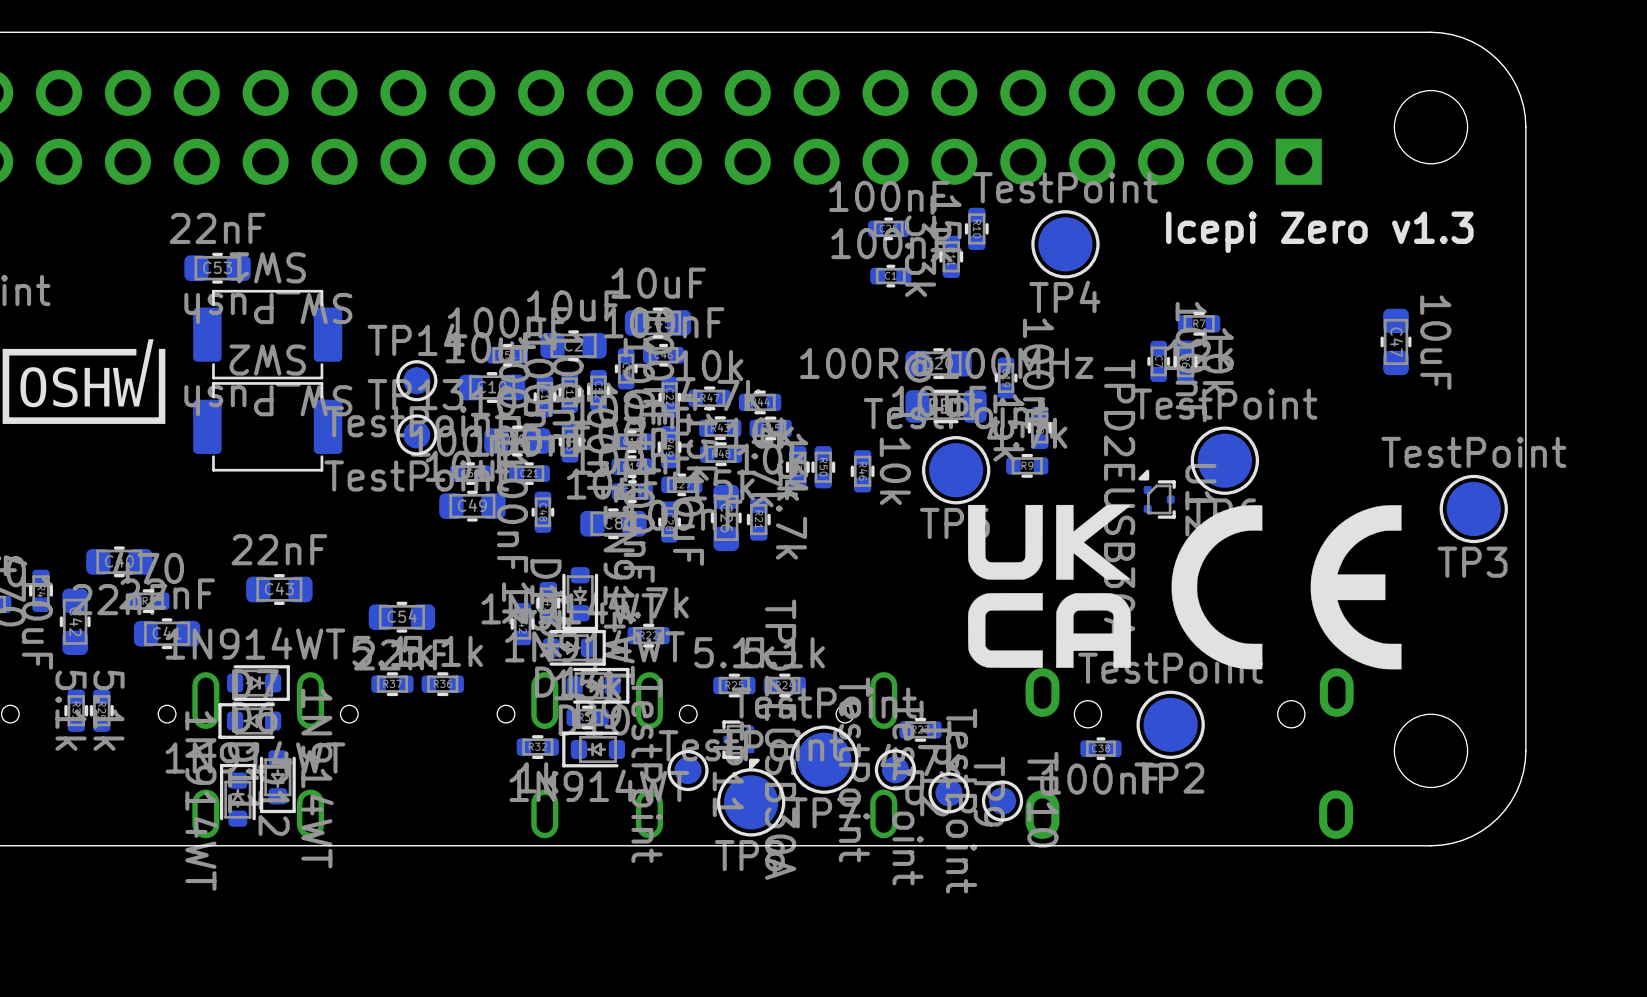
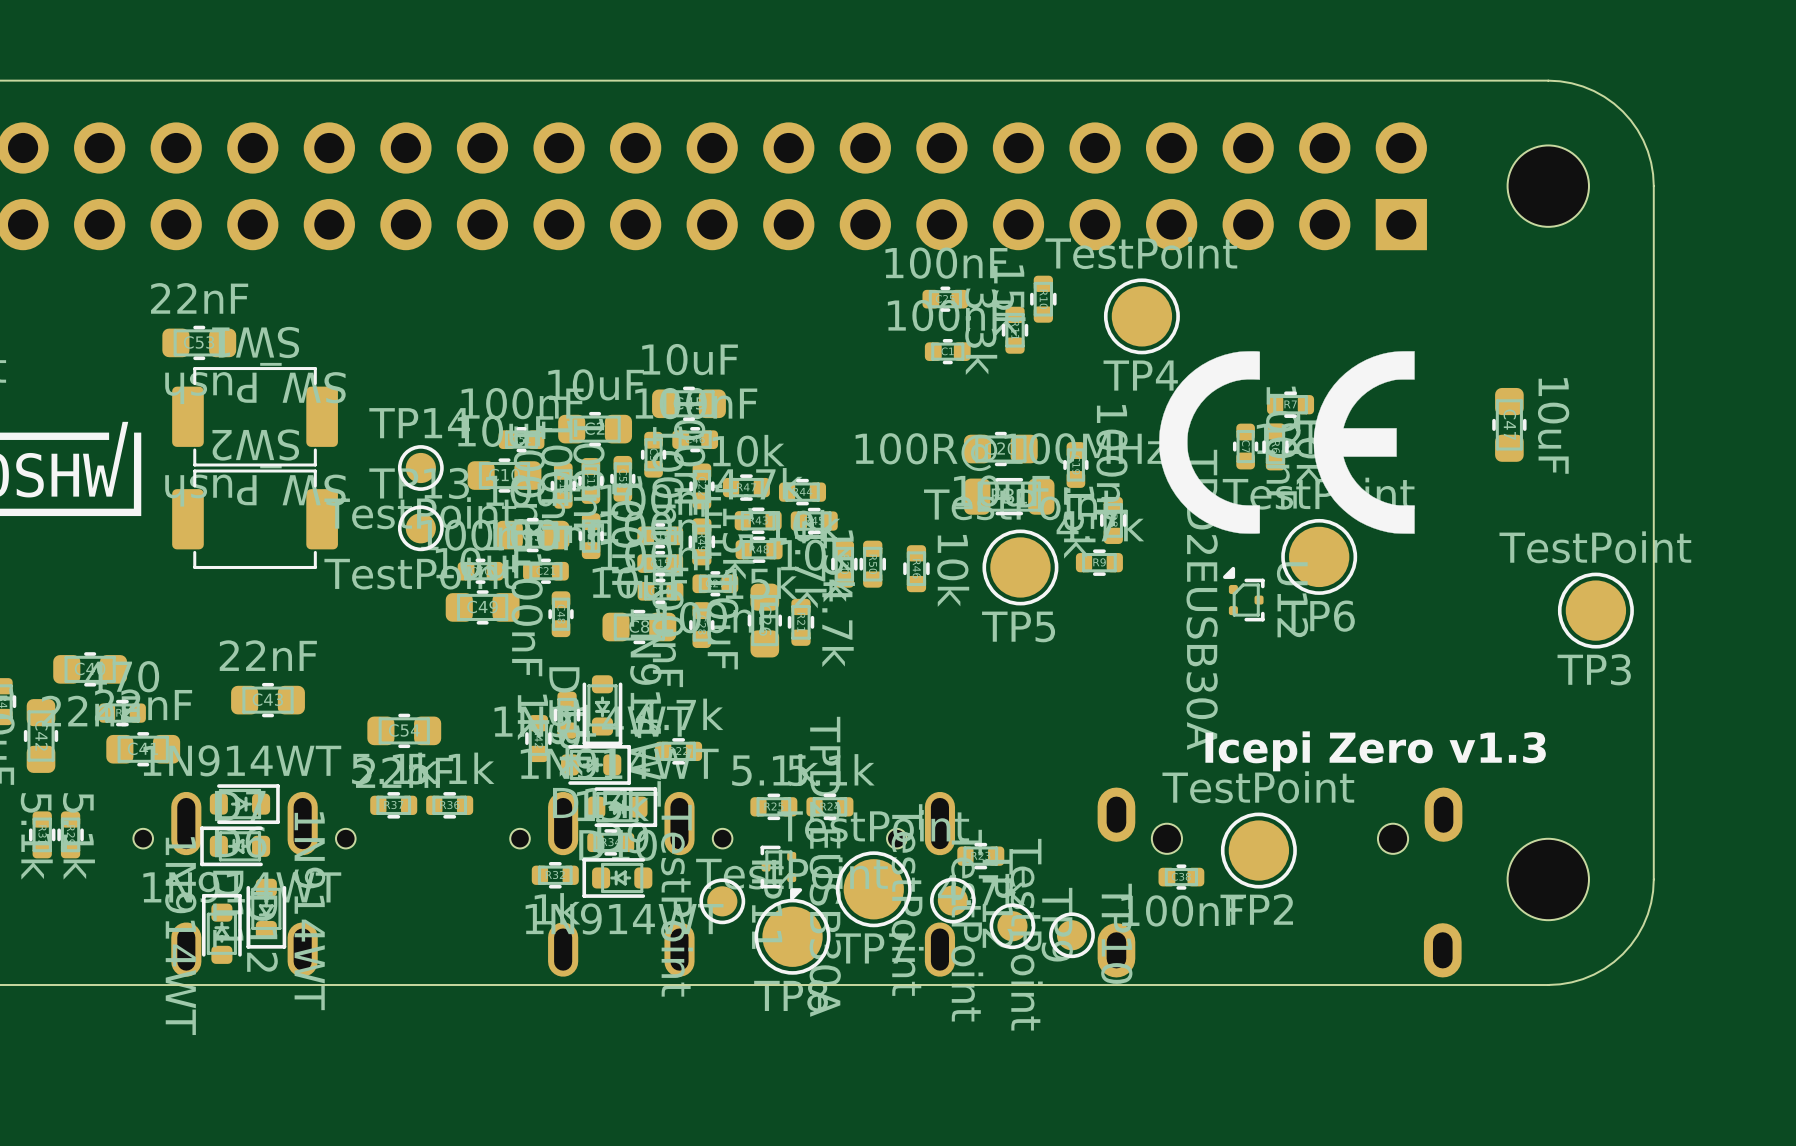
text position: Icepi Zero v1.3 (1319, 232) -> Icepi Zero v1.3 (1375, 751)
drawing: [967, 504, 1131, 668] -> none
drawing position: (1286, 587) -> (1286, 442)

